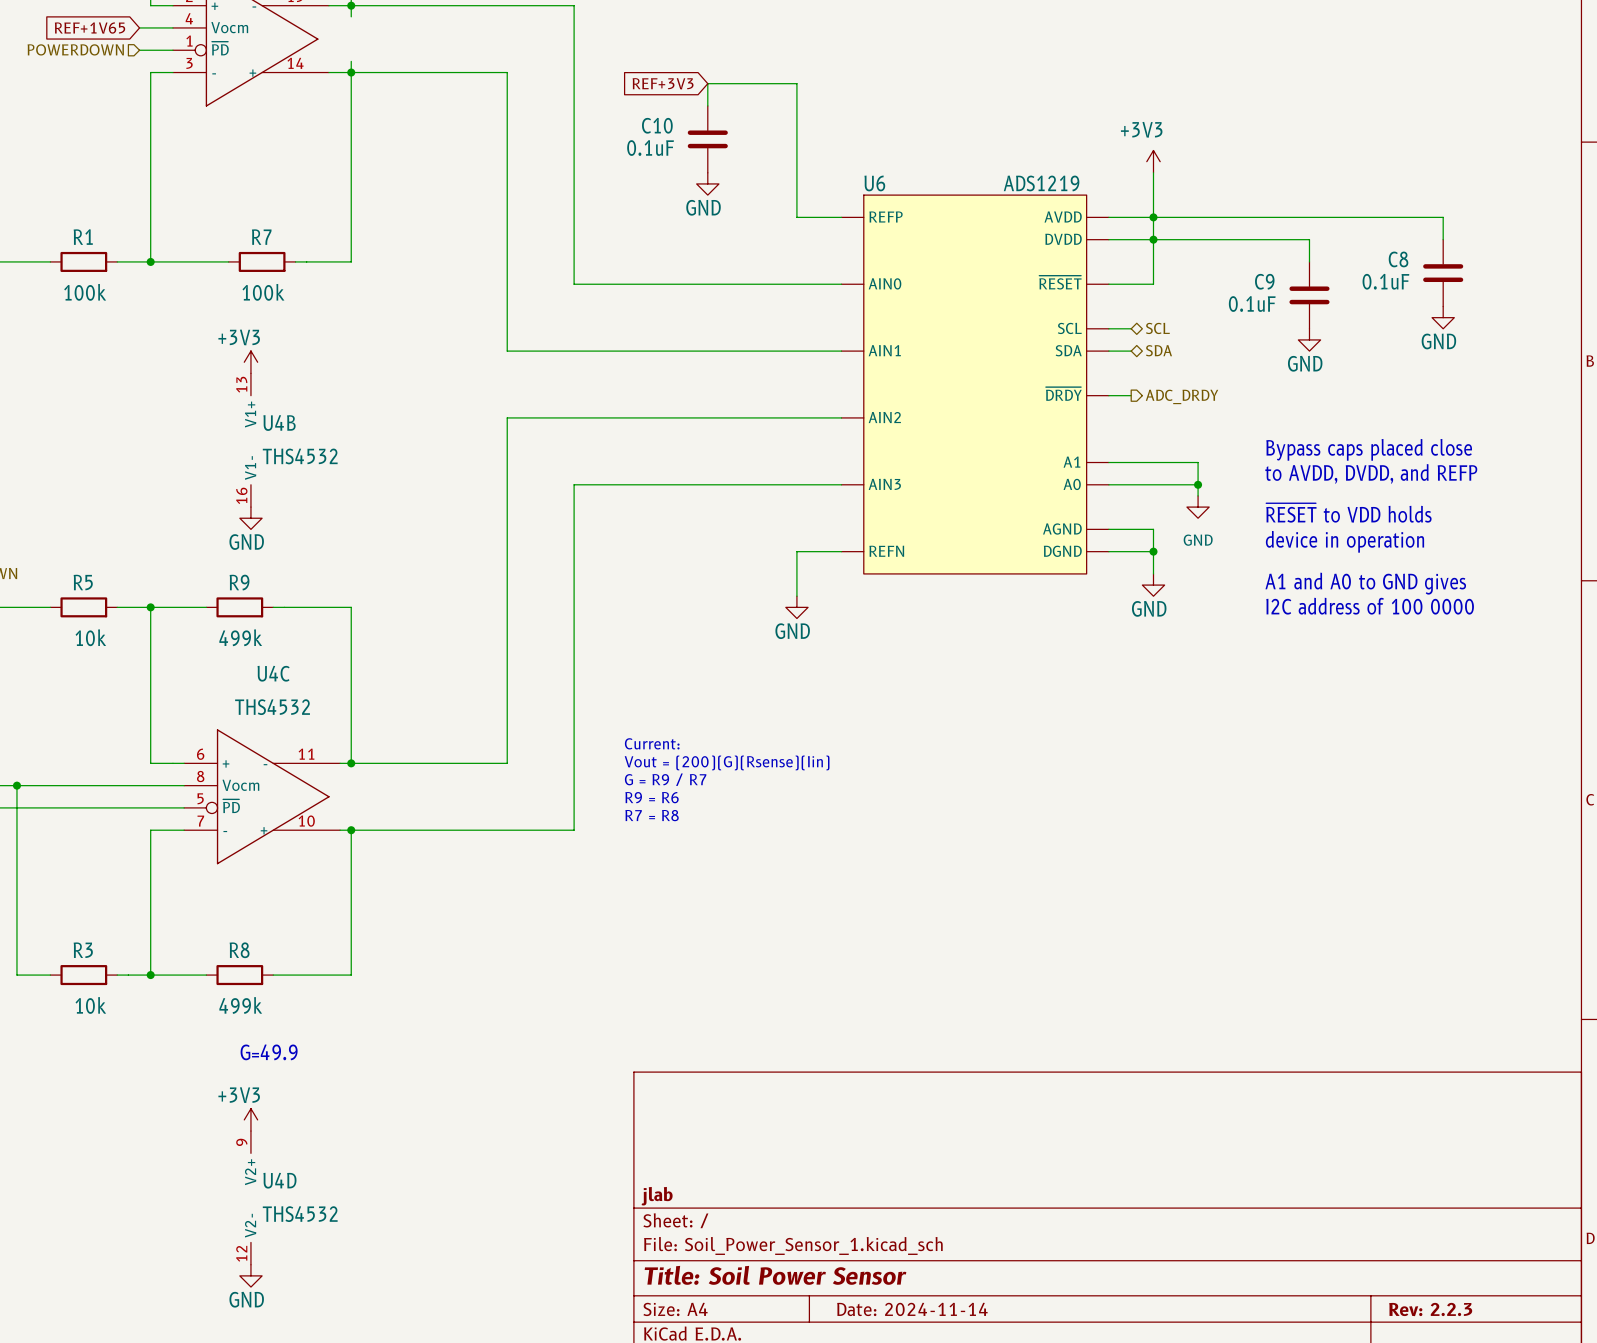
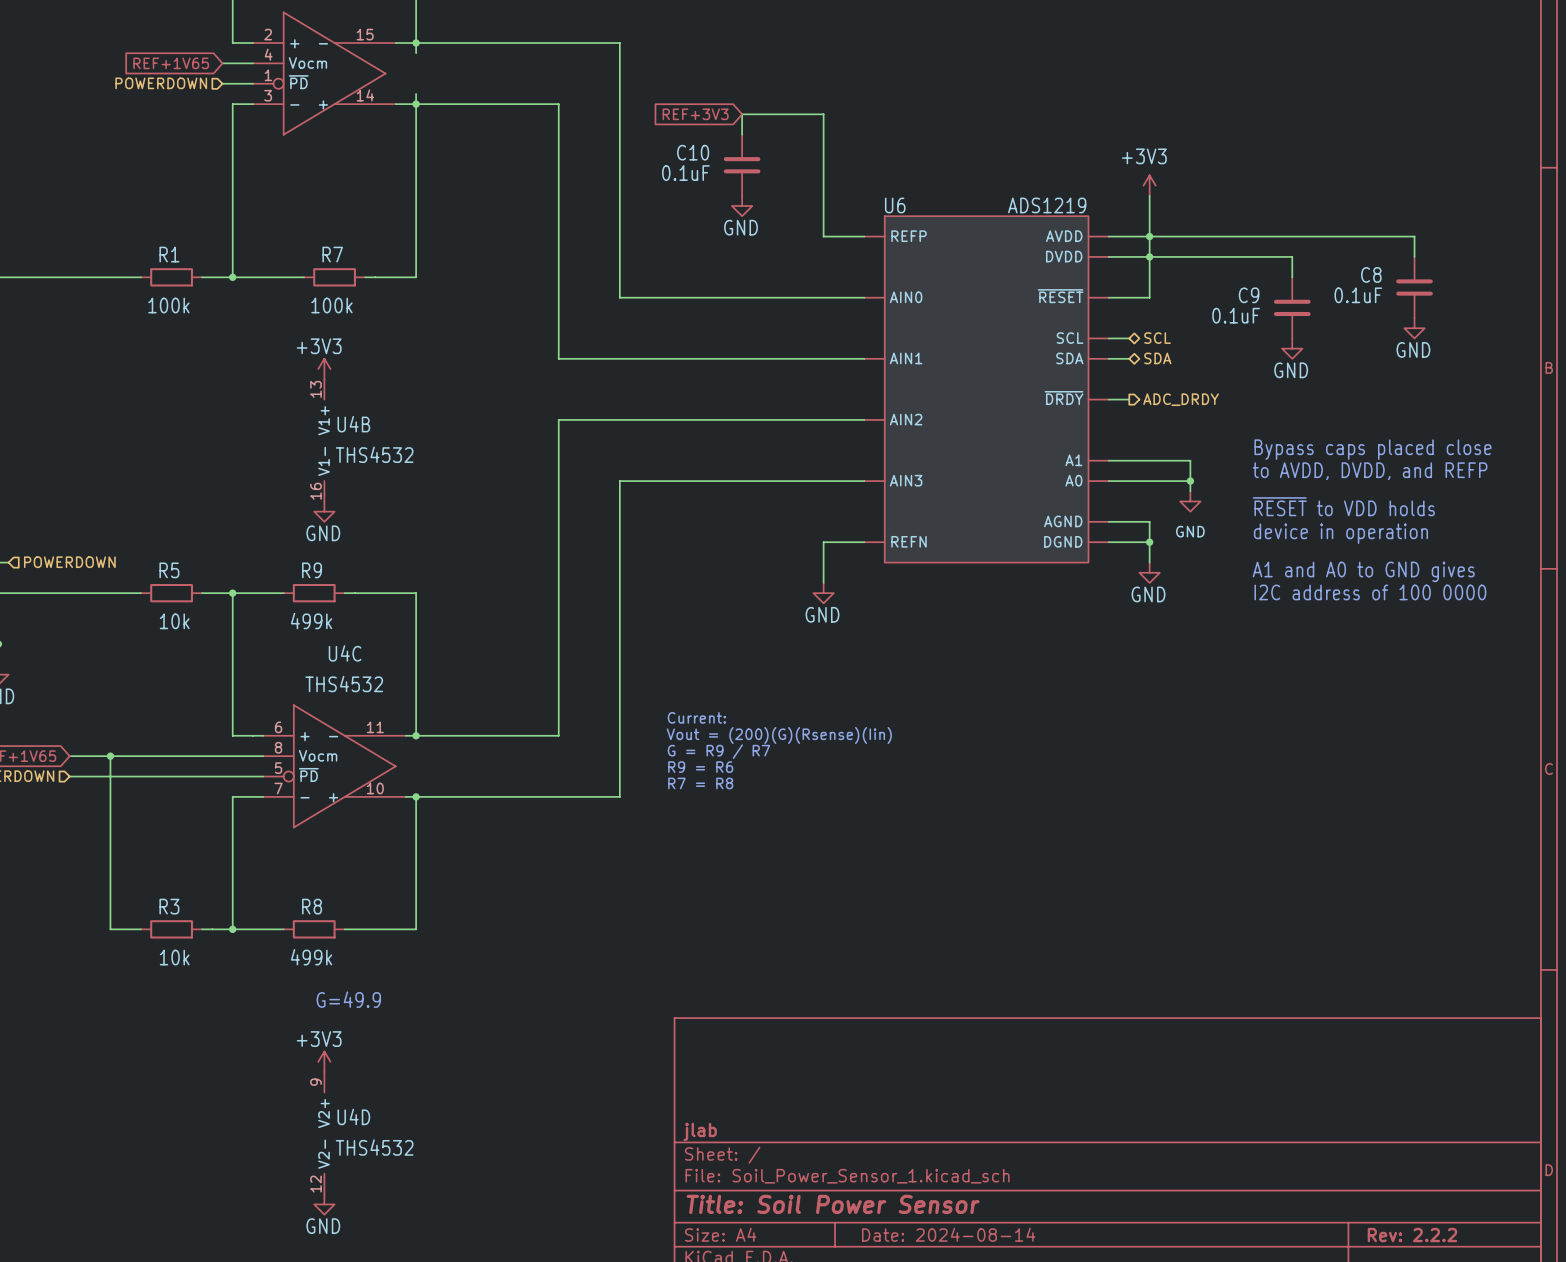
title block: Date: 2024-11-14 (912, 1309) -> Date: 2024-08-14 (948, 1234)
title block: Rev: 2.2.3 (1430, 1309) -> Rev: 2.2.2 (1412, 1235)

